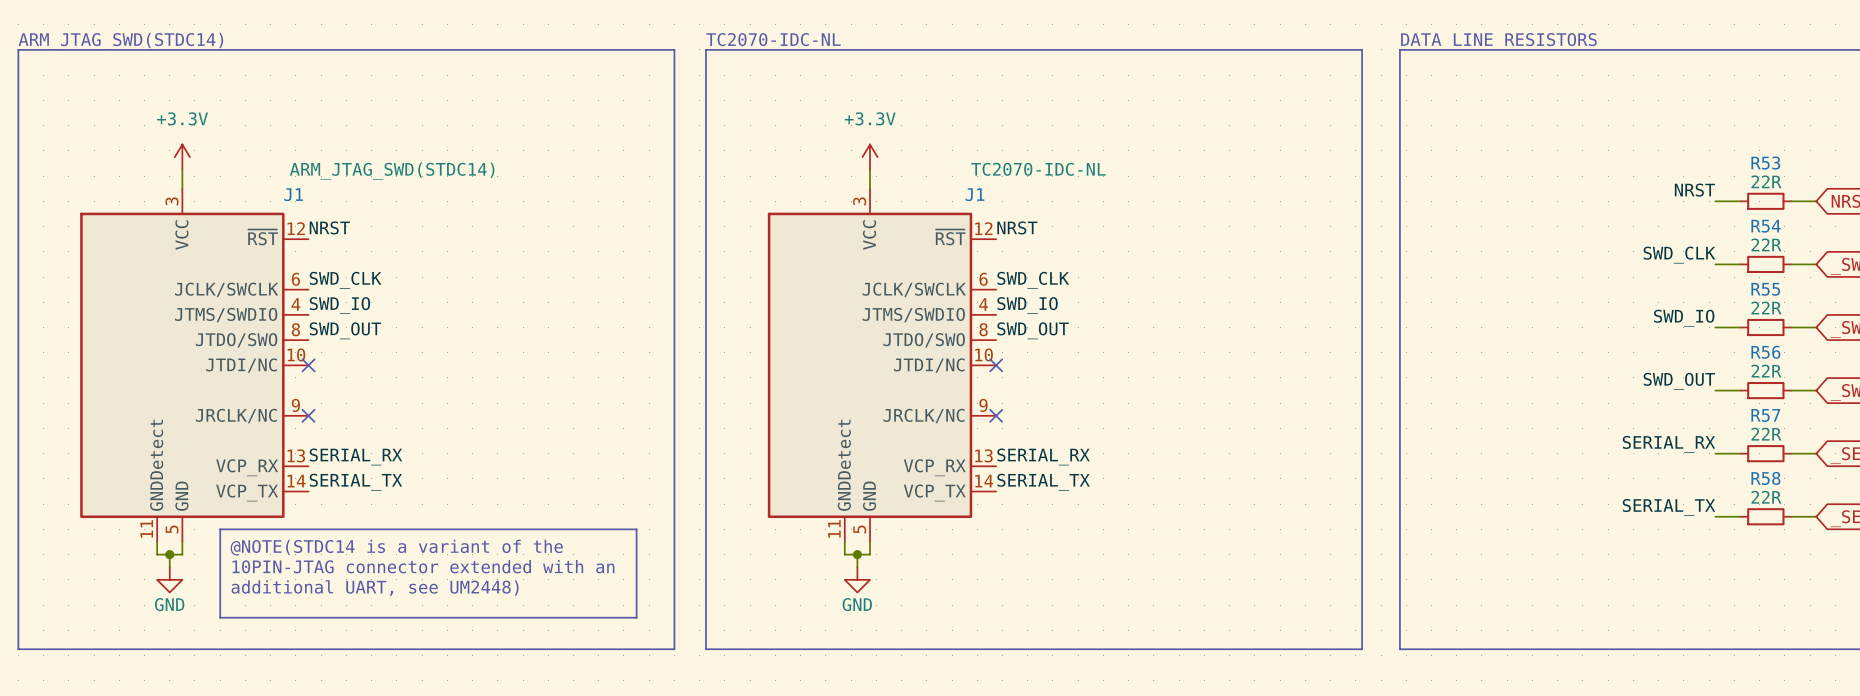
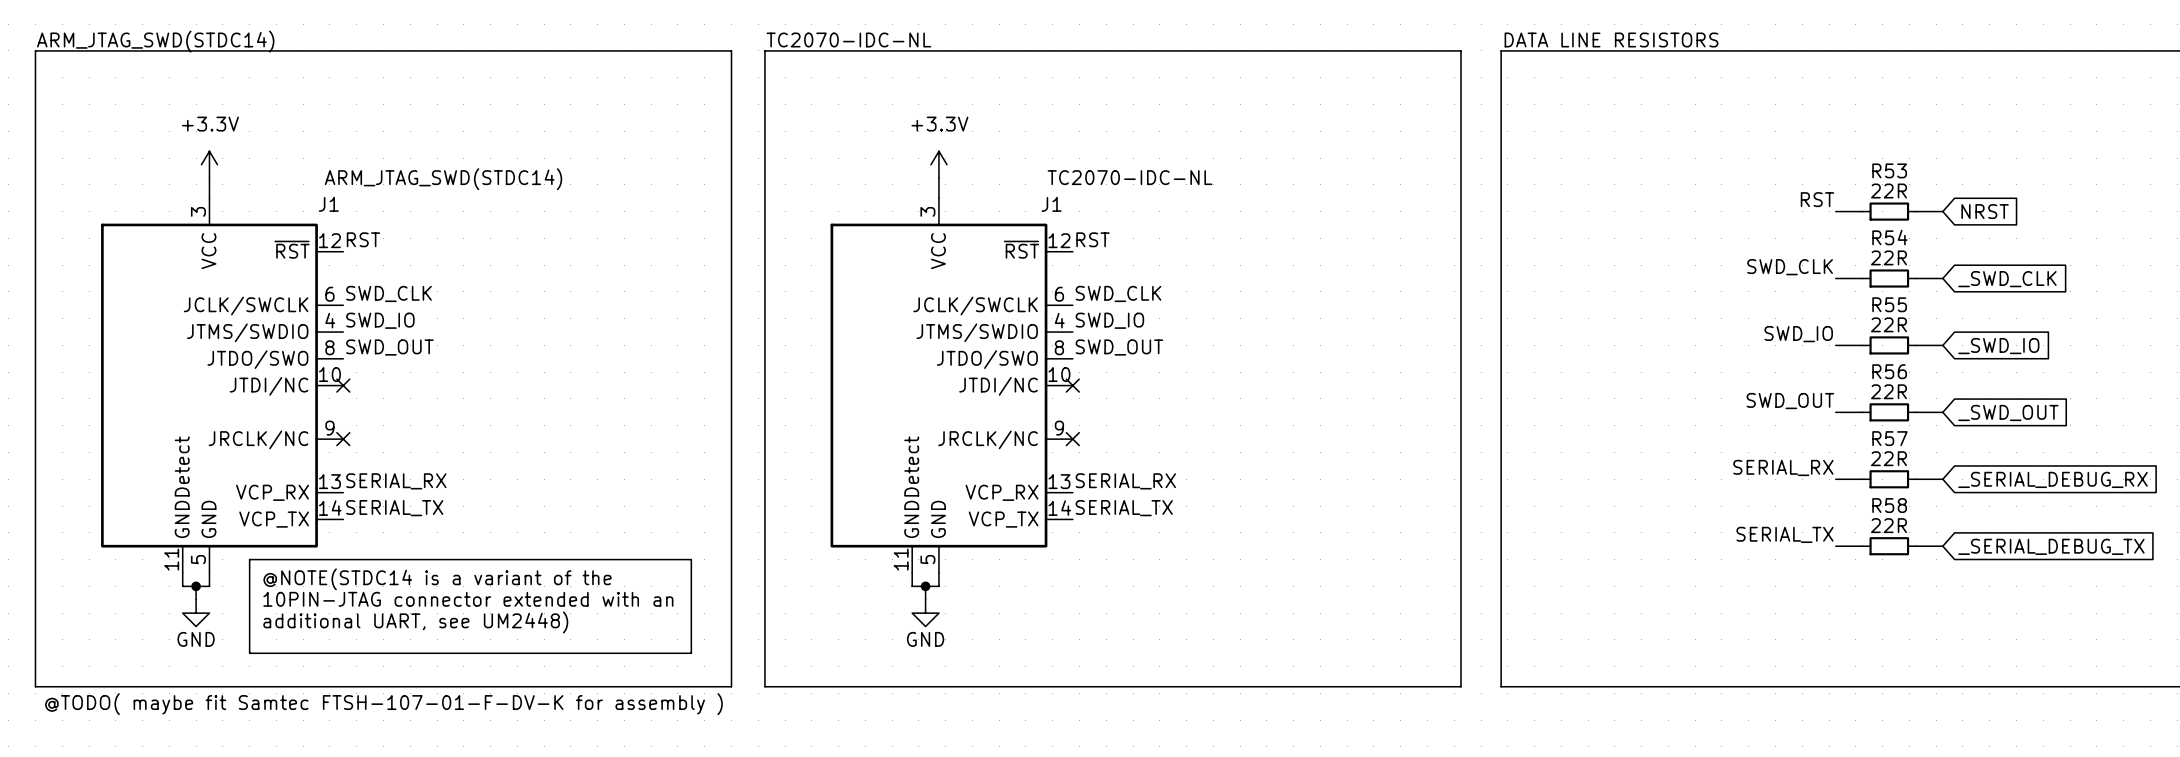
label: NRST (1694, 190) -> RST (1817, 199)
label: NRST (329, 227) -> RST (363, 239)
label: NRST (1017, 227) -> RST (1092, 239)
text: none -> @TODO( maybe fit Samtec FTSH-107-01-F-DV-K for assembly ) (383, 704)

